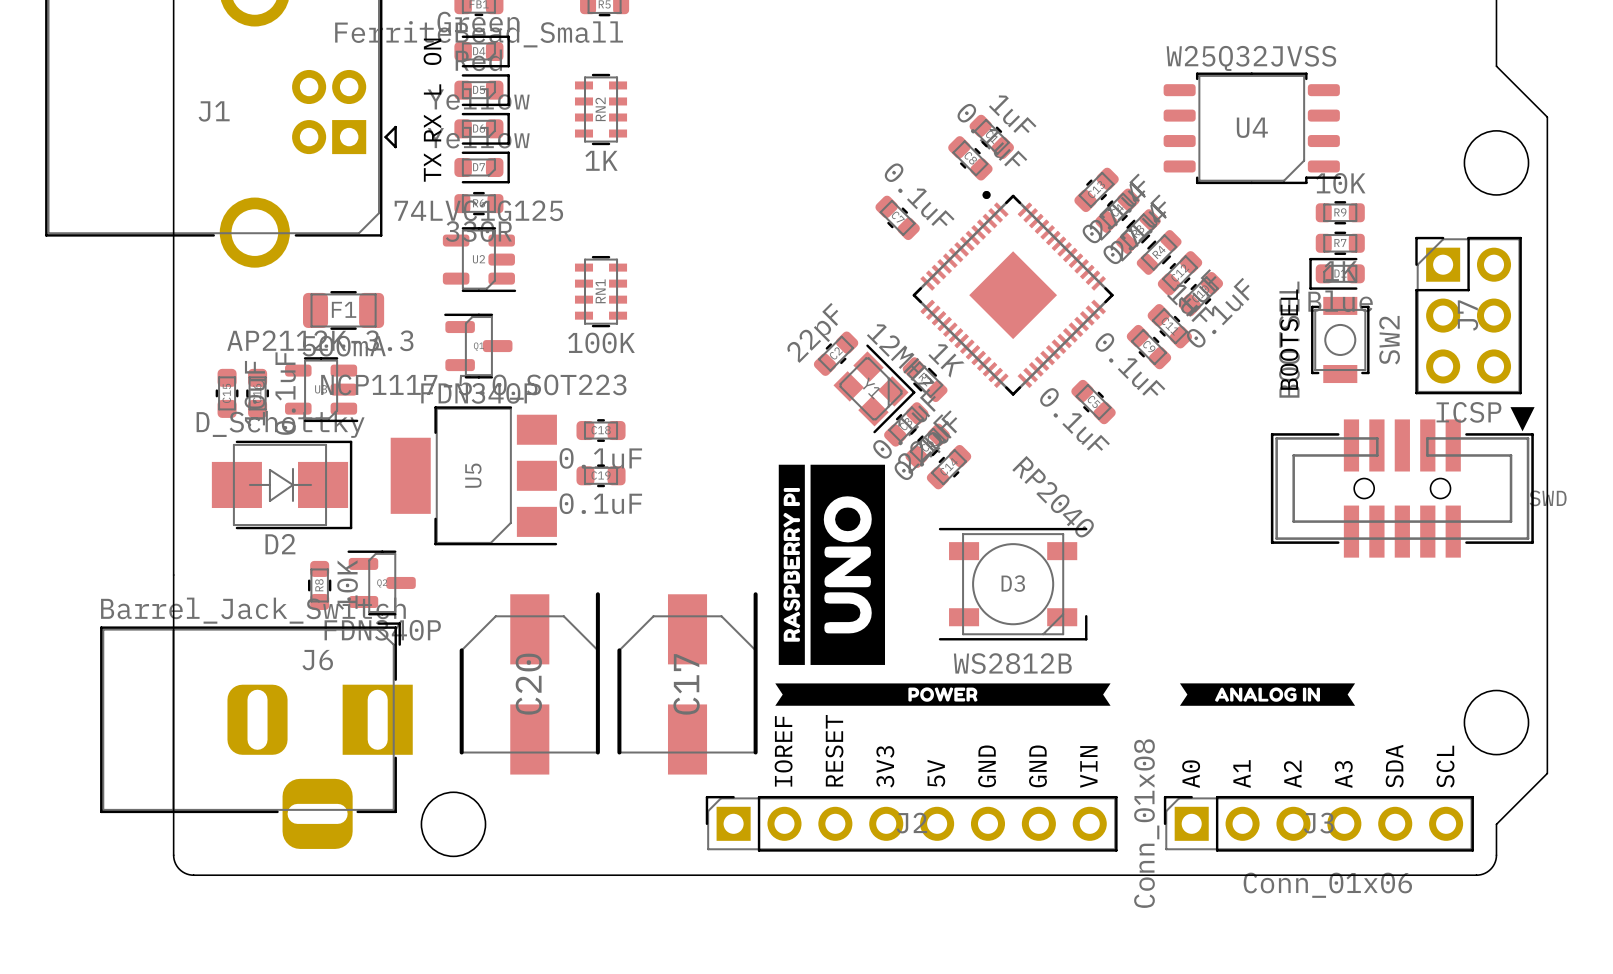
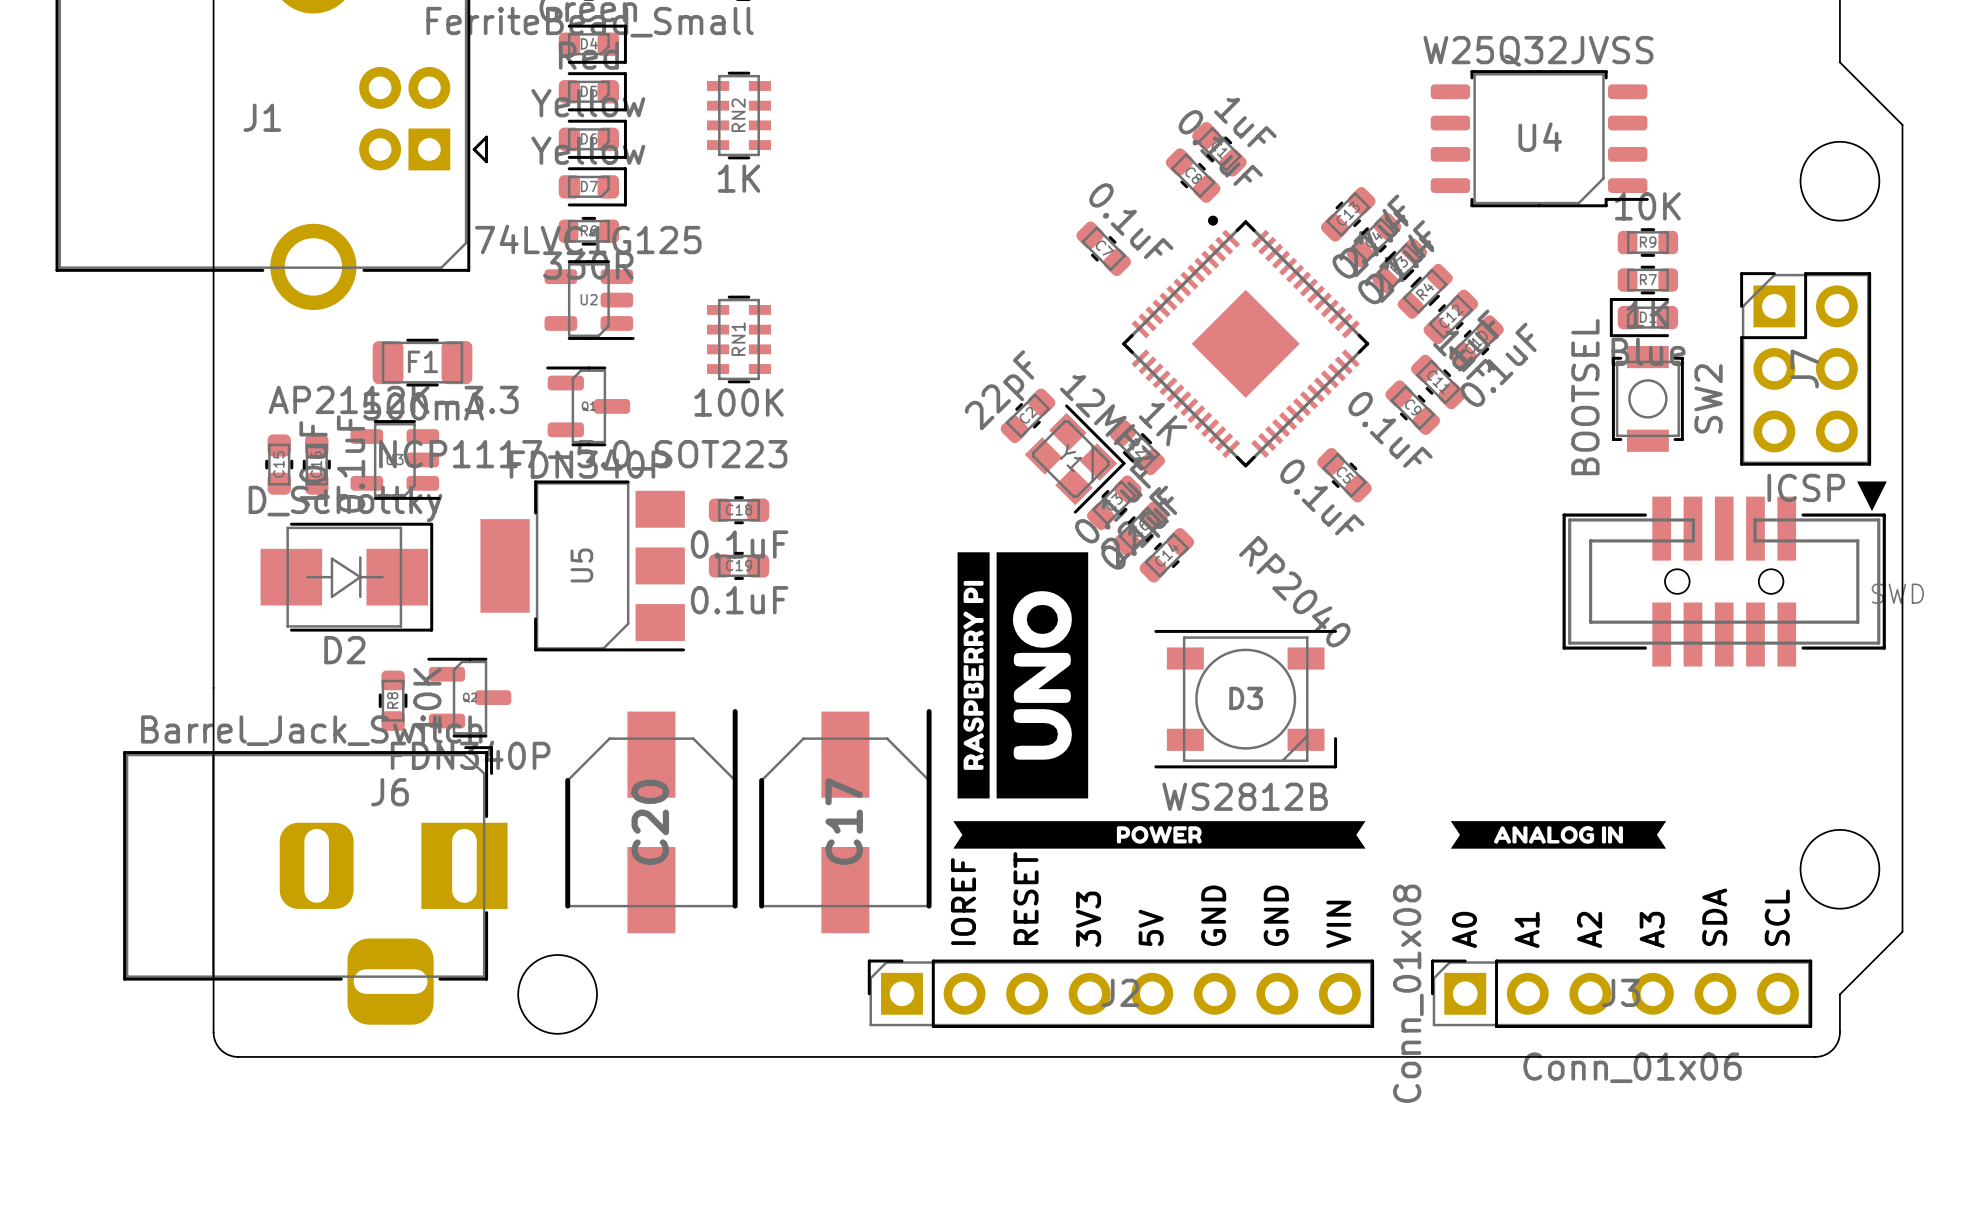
text: ON (432, 51) -> none
text: L (432, 89) -> none
text: RX (432, 128) -> none
text: TX (432, 167) -> none
text: BOOTSEL (1289, 339) -> none

